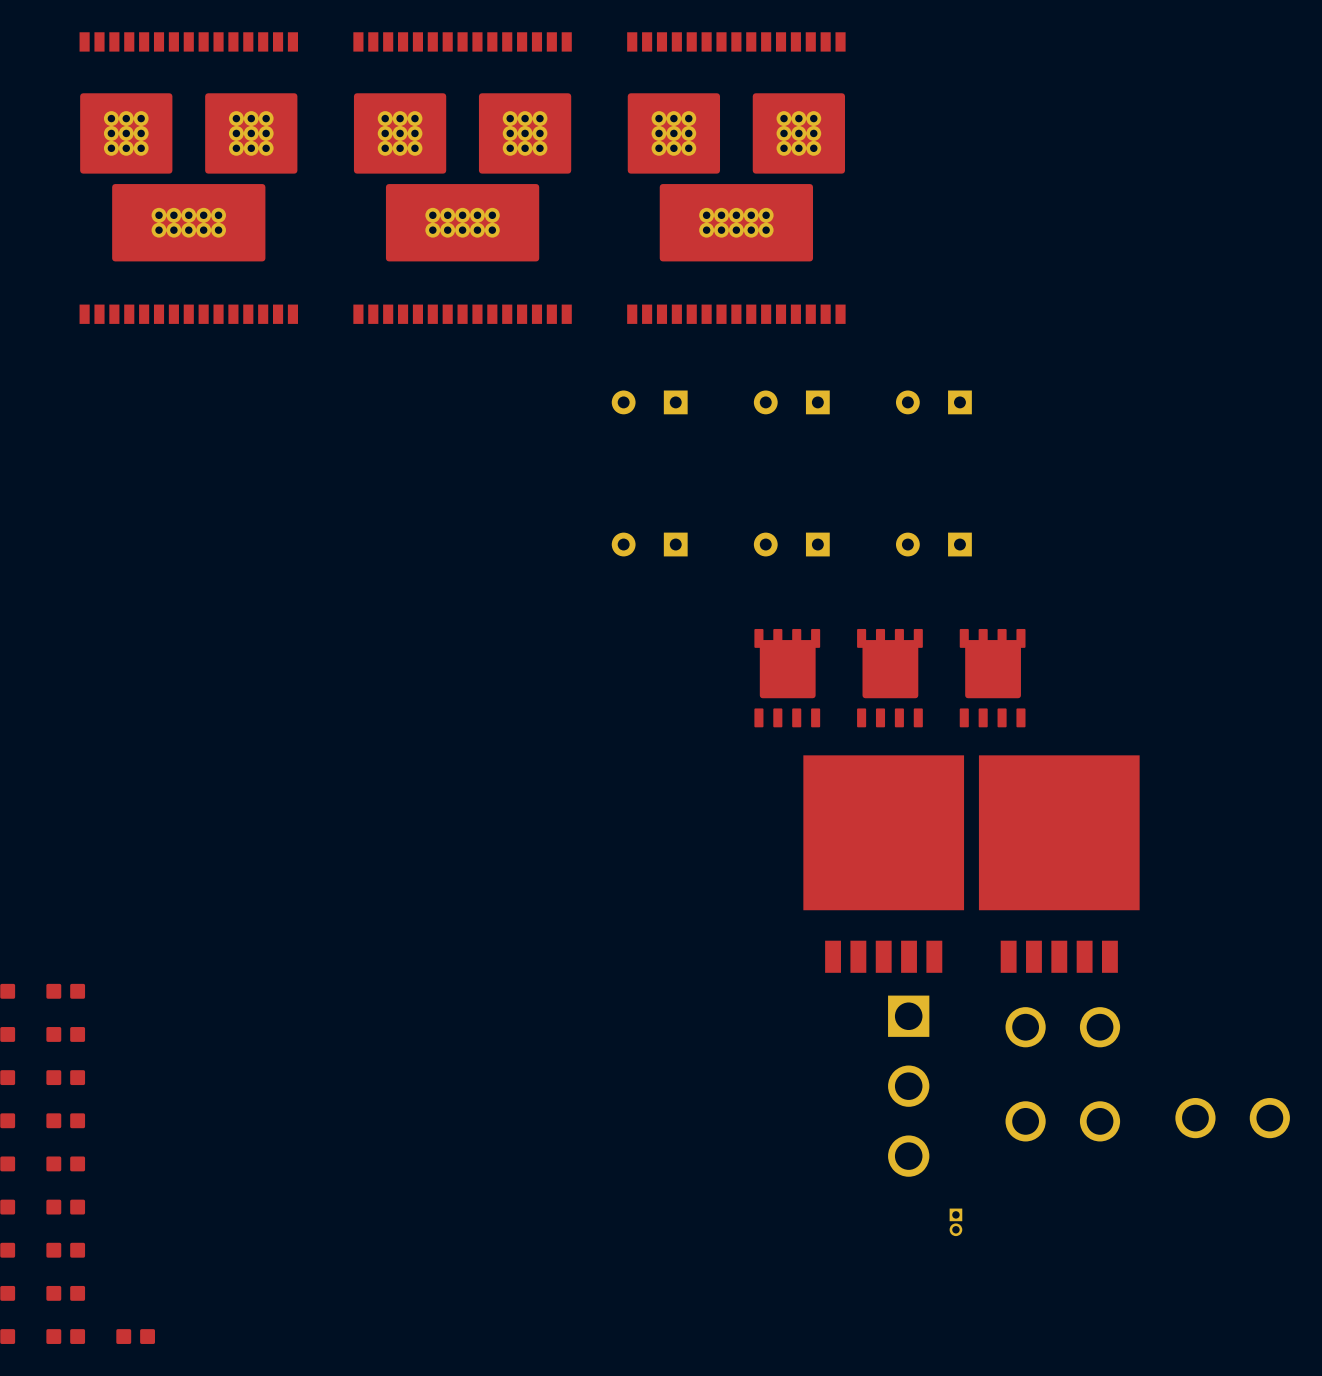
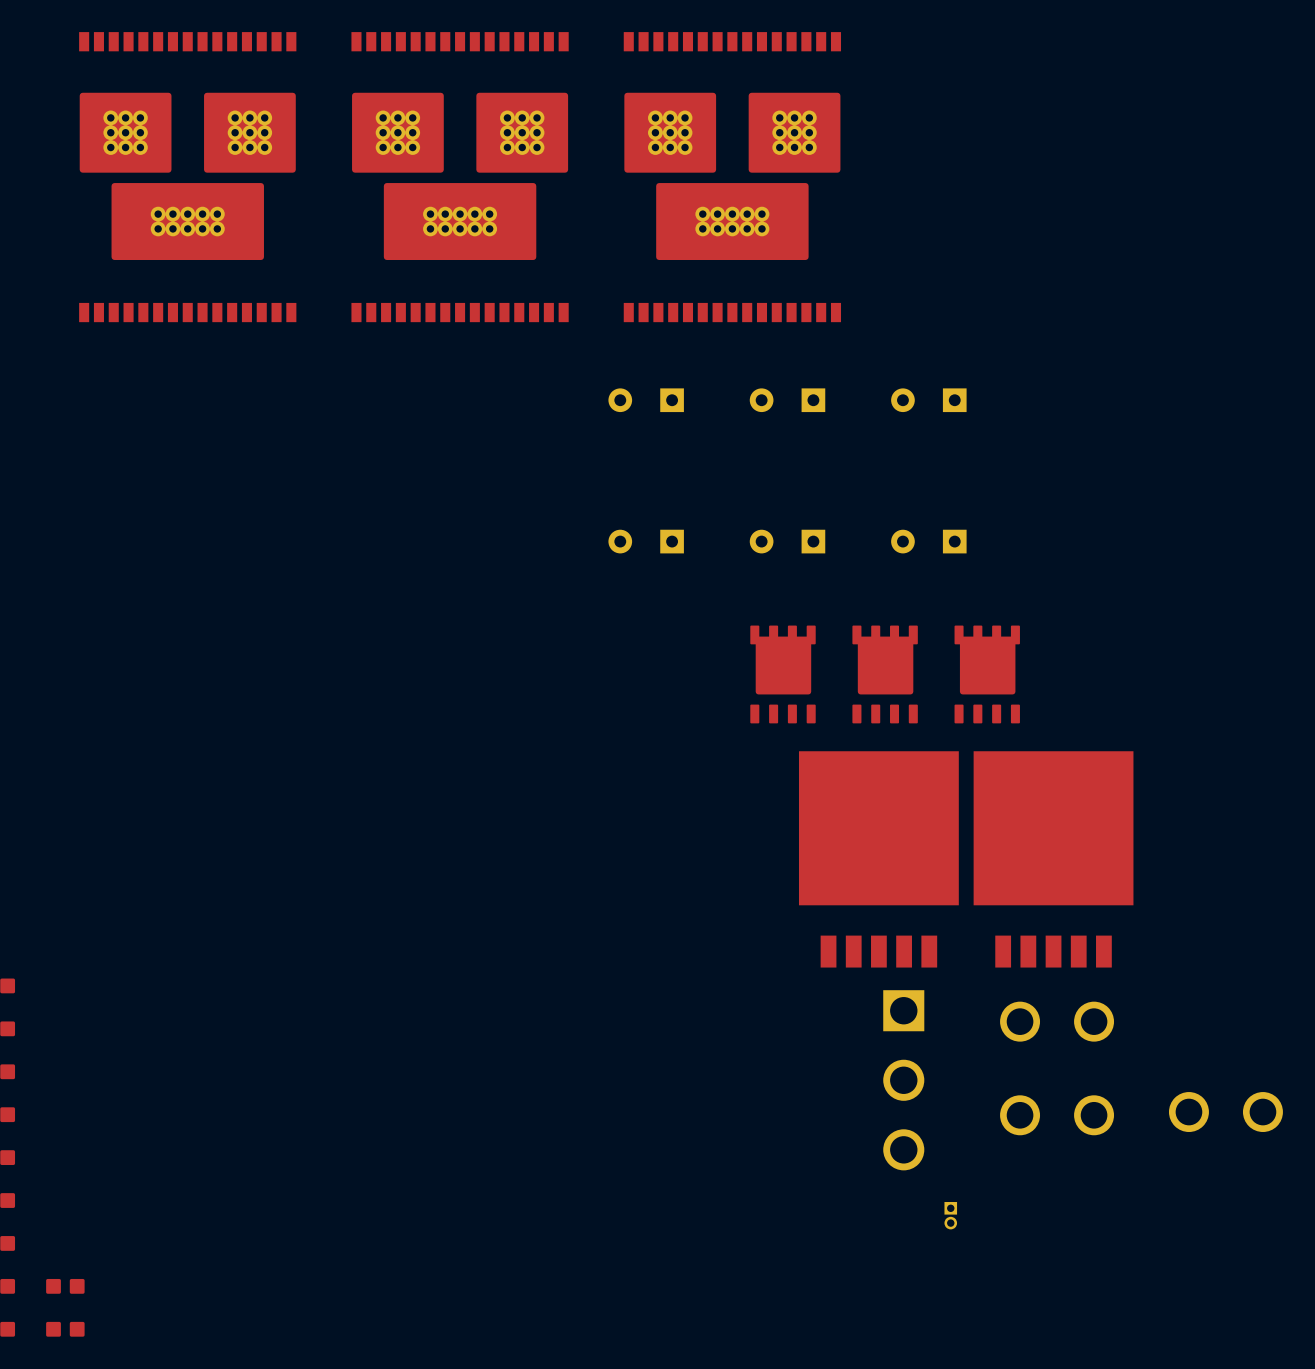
part: (65, 991) -> none
part: (65, 1034) -> none
part: (65, 1077) -> none
part: (65, 1120) -> none
part: (65, 1163) -> none
part: (65, 1207) -> none
part: (65, 1250) -> none
part: (135, 1336) -> none

